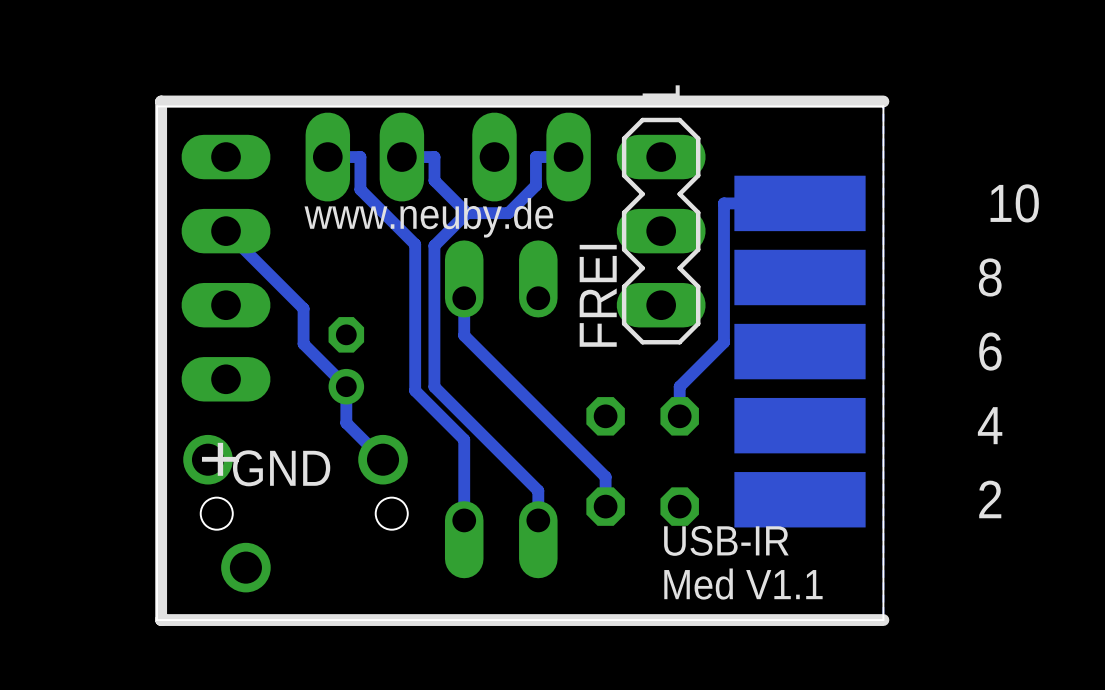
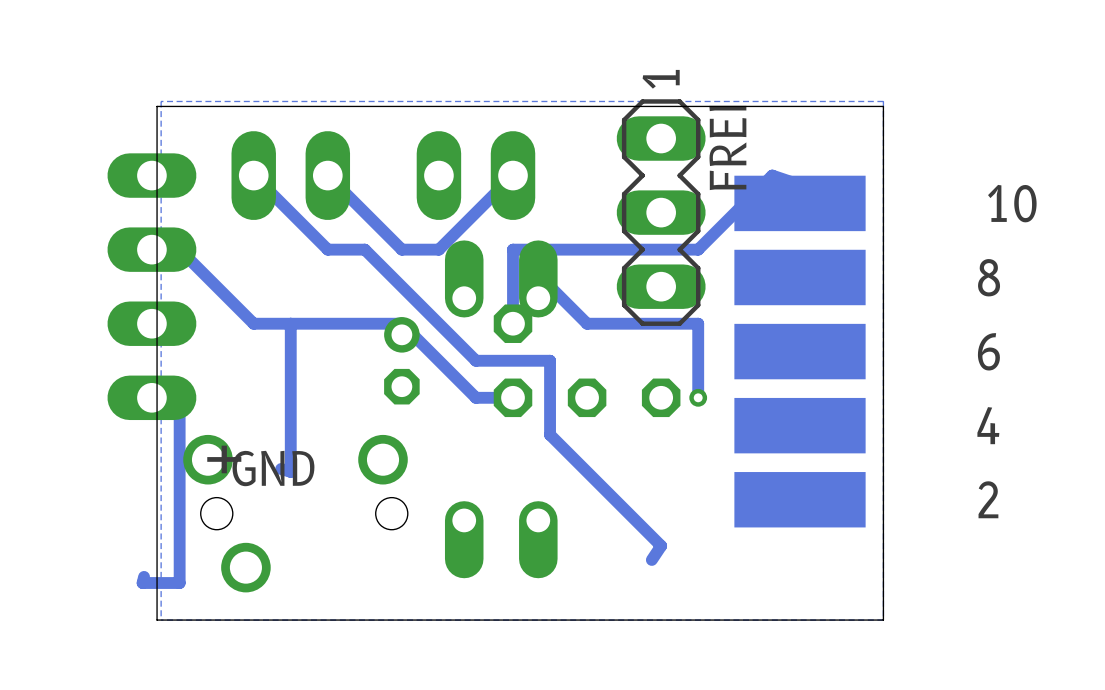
line: (883, 101) (161, 101) (161, 620) (883, 620) -> none
track: (327, 157) (360, 157) (360, 189) (415, 244) (415, 390) (464, 439) (464, 520) -> none
part: (364, 157) -> none
track: (401, 157) (434, 157) (434, 180) (467, 213) -> none
part: (531, 157) -> none
track: (568, 157) (535, 157) (535, 185) (508, 213) (467, 213) -> none
track: none -> (253, 175) (327, 249) (364, 249) (475, 360) (550, 360) (550, 434) (661, 545) (651, 559)
part: none -> (290, 175)
part: none -> (475, 175)
track: none -> (513, 175) (438, 249) (401, 249) (327, 175)
track: none -> (800, 184) (772, 175) (698, 249) (513, 249) (513, 323)
track: (800, 203) (724, 203) (724, 342) (679, 386) (679, 416) -> none
track: (467, 213) (434, 245) (434, 386) (538, 490) (538, 520) -> none
text: www.neuby.de (428, 217) -> none
track: (226, 231) (303, 308) (303, 343) (346, 386) (346, 423) (383, 459) -> none
FREI position: (661, 231) -> (661, 212)
track: none -> (151, 249) (179, 249) (253, 323) (401, 323)
part position: (226, 268) -> (151, 286)
track: none -> (550, 286) (587, 323) (698, 323) (698, 397)
FREI name position: FREI (598, 295) -> FREI (727, 147)
track: (464, 298) (464, 335) (605, 476) (605, 506) -> none
track: none -> (290, 323) (290, 471) (281, 468)
track: none -> (401, 323) (475, 397) (513, 397)
part rotation: 0° (346, 360) -> 180° (401, 360)
part position: (346, 360) -> (401, 360)
track: none -> (151, 397) (179, 397) (179, 583) (142, 583) (144, 576)
via: none -> (698, 397)
part position: (642, 416) -> (624, 397)
part rotation: 0° (642, 506) -> 90° clockwise (513, 360)
part position: (642, 506) -> (513, 360)
text: USB-IR (726, 540) -> none
text: Med V1.1 (743, 584) -> none

